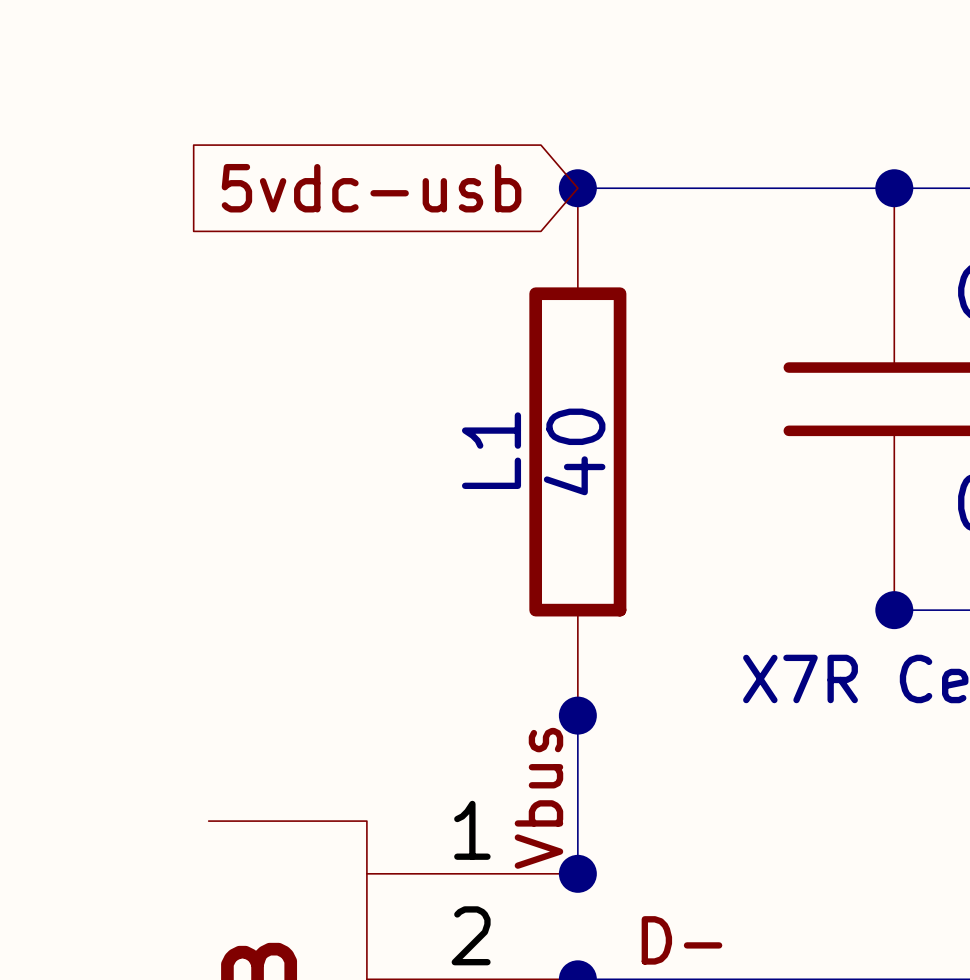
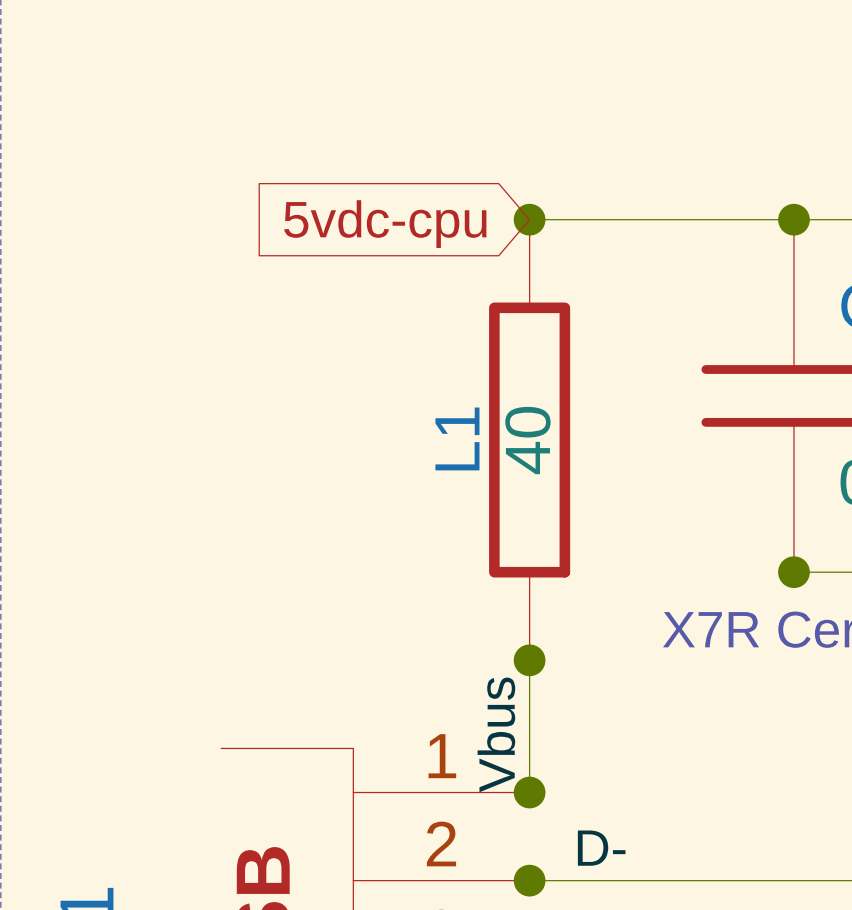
global label: 5vdc-usb (371, 188) -> 5vdc-cpu (385, 224)

